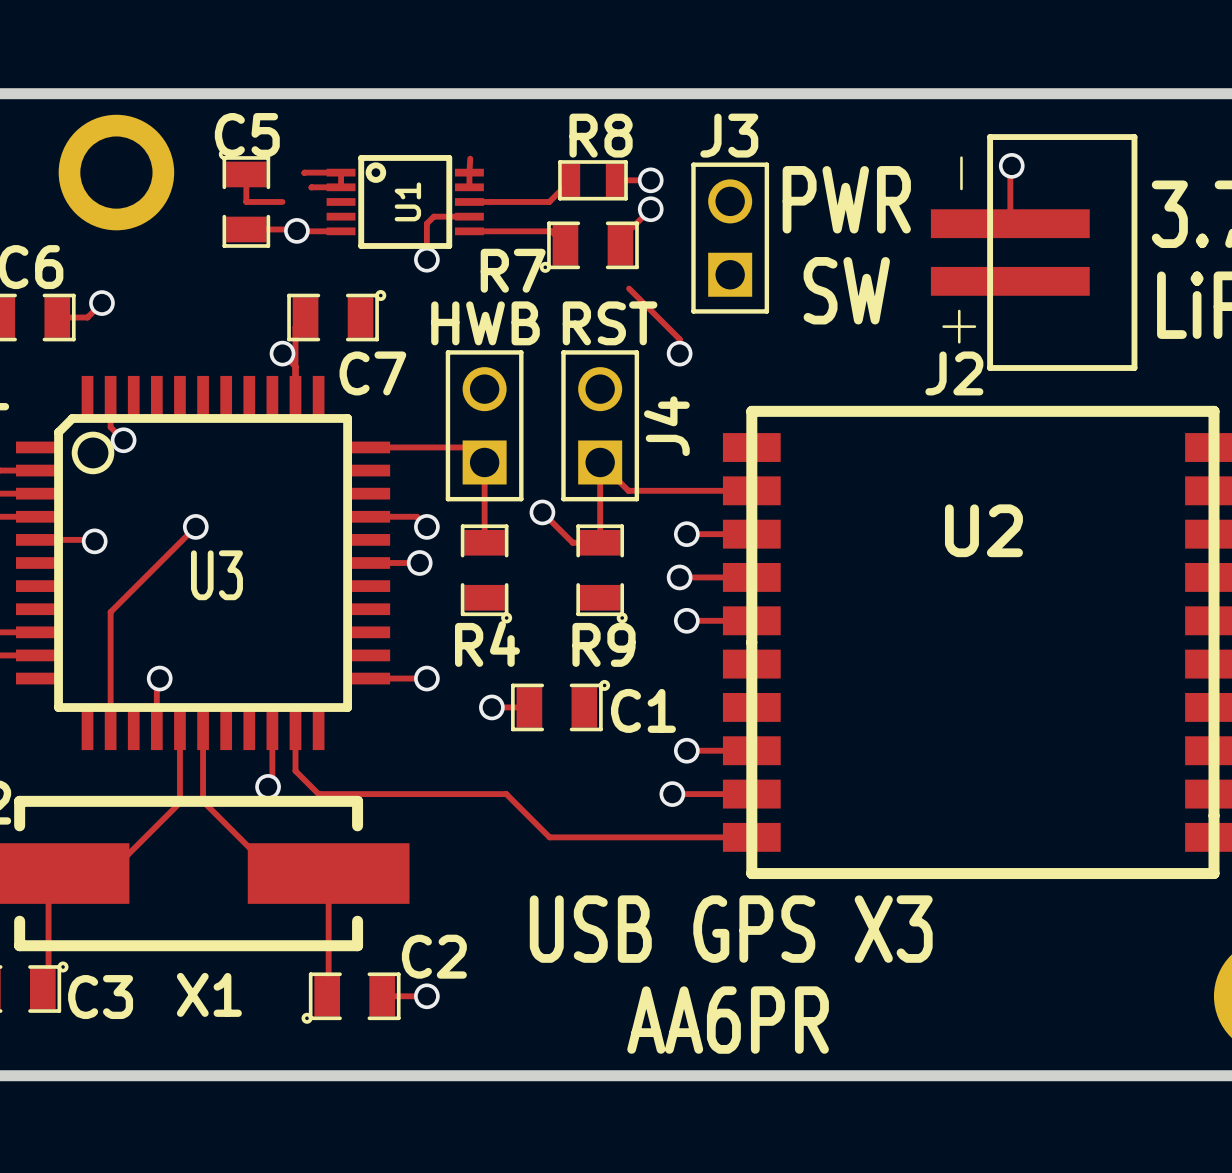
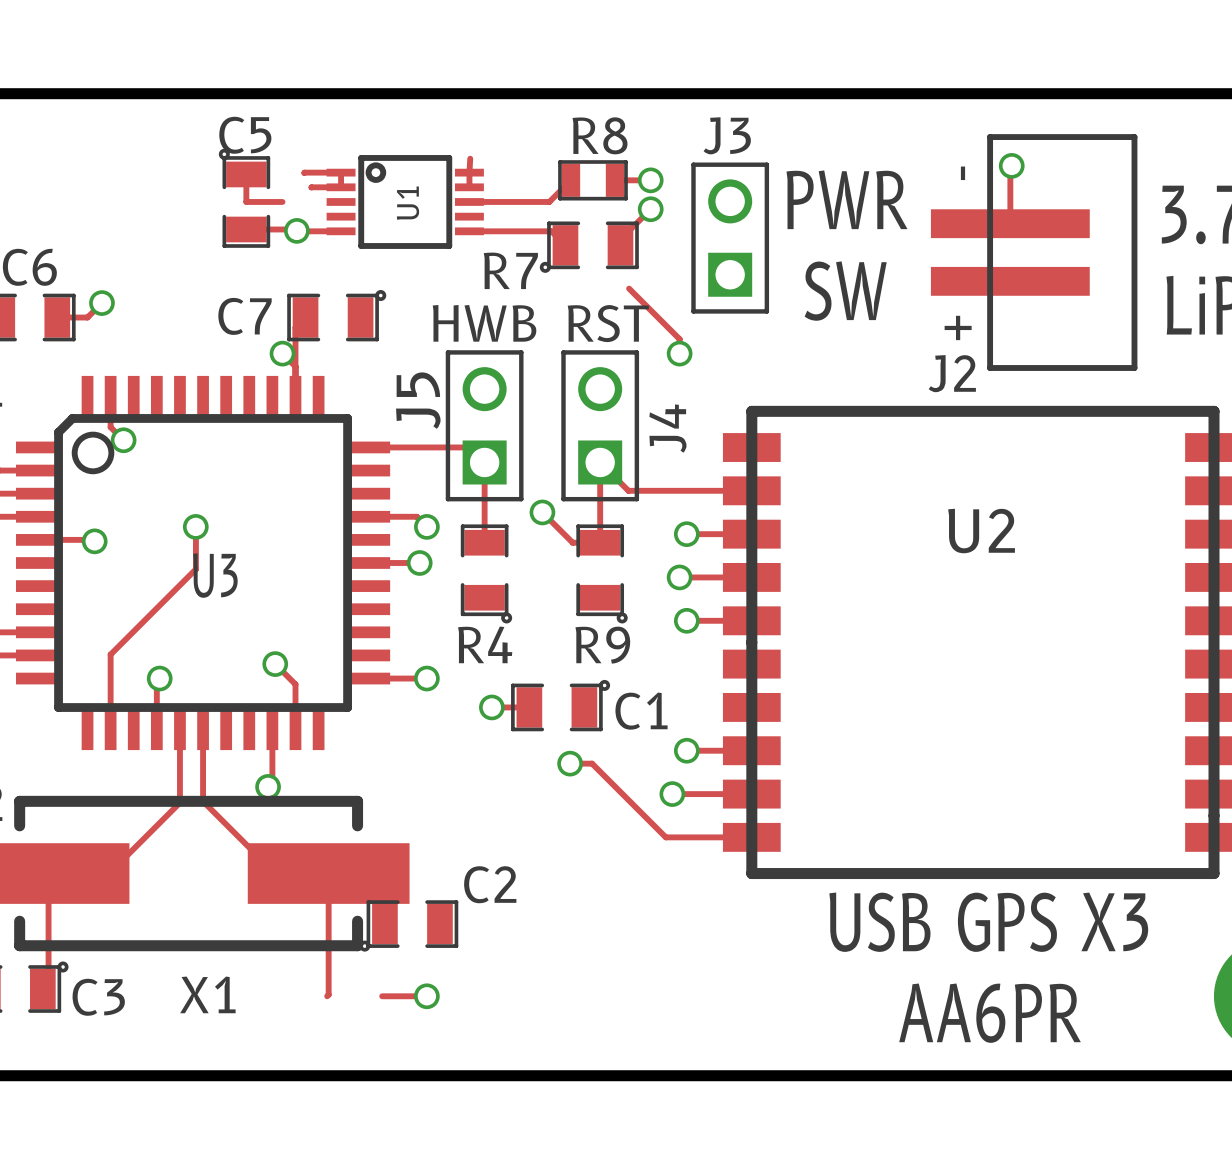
part: (116, 172) -> none
track: (469, 216) (433, 216) (426, 223) (426, 259) -> none
via: (426, 259) -> none
C7 name position: C7 (372, 373) -> C7 (245, 316)
J5 name: none -> J5 (418, 400)
track: (195, 526) (110, 612) (110, 654) -> (195, 526) (195, 569) (110, 654)
track: none -> (275, 664) (295, 684) (295, 728)
via: none -> (275, 664)
track: (295, 728) (295, 770) (318, 794) (506, 794) (549, 837) (665, 837) -> (570, 763) (592, 763) (665, 837)
via: none -> (570, 763)
text position: USB GPS X3 (731, 929) -> USB GPS X3 (988, 922)
C2 position: (351, 998) -> (408, 925)
text position: AA6PR (728, 1020) -> AA6PR (990, 1013)

